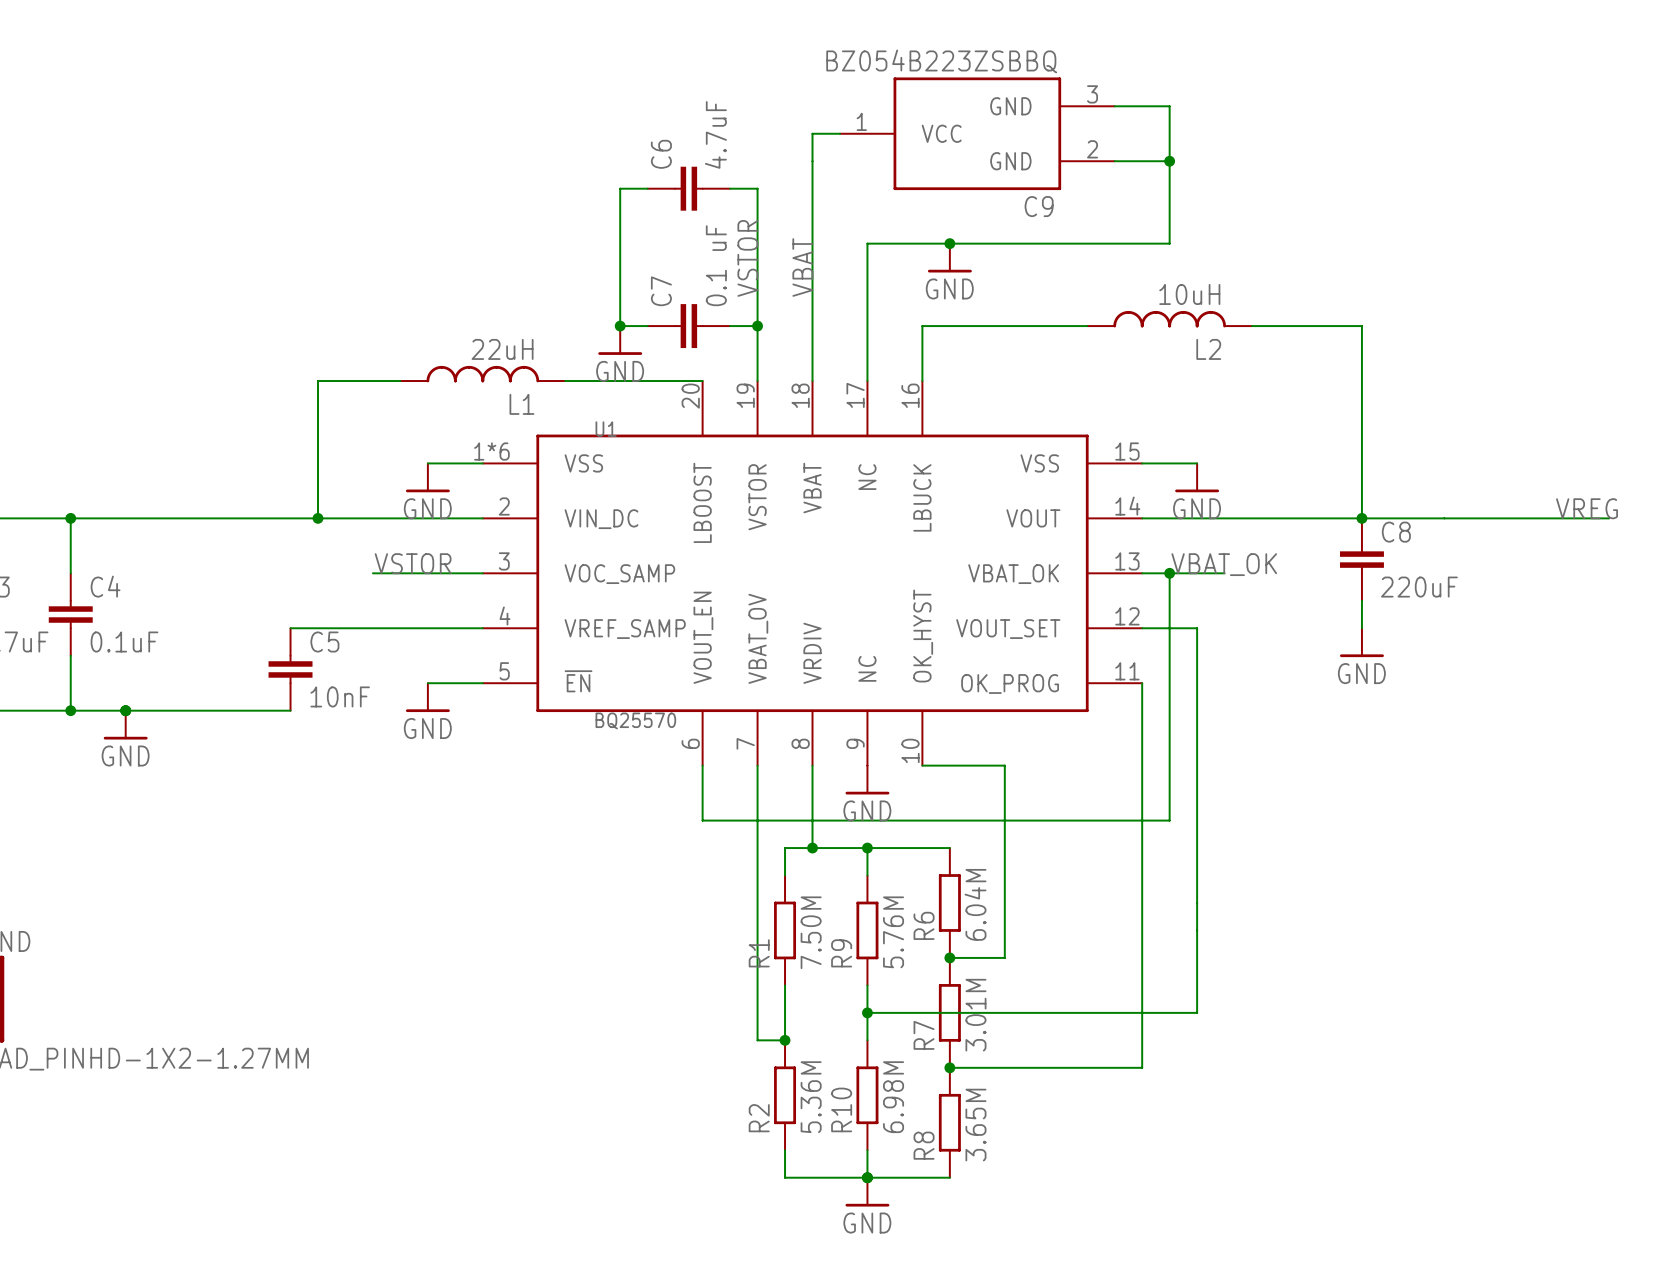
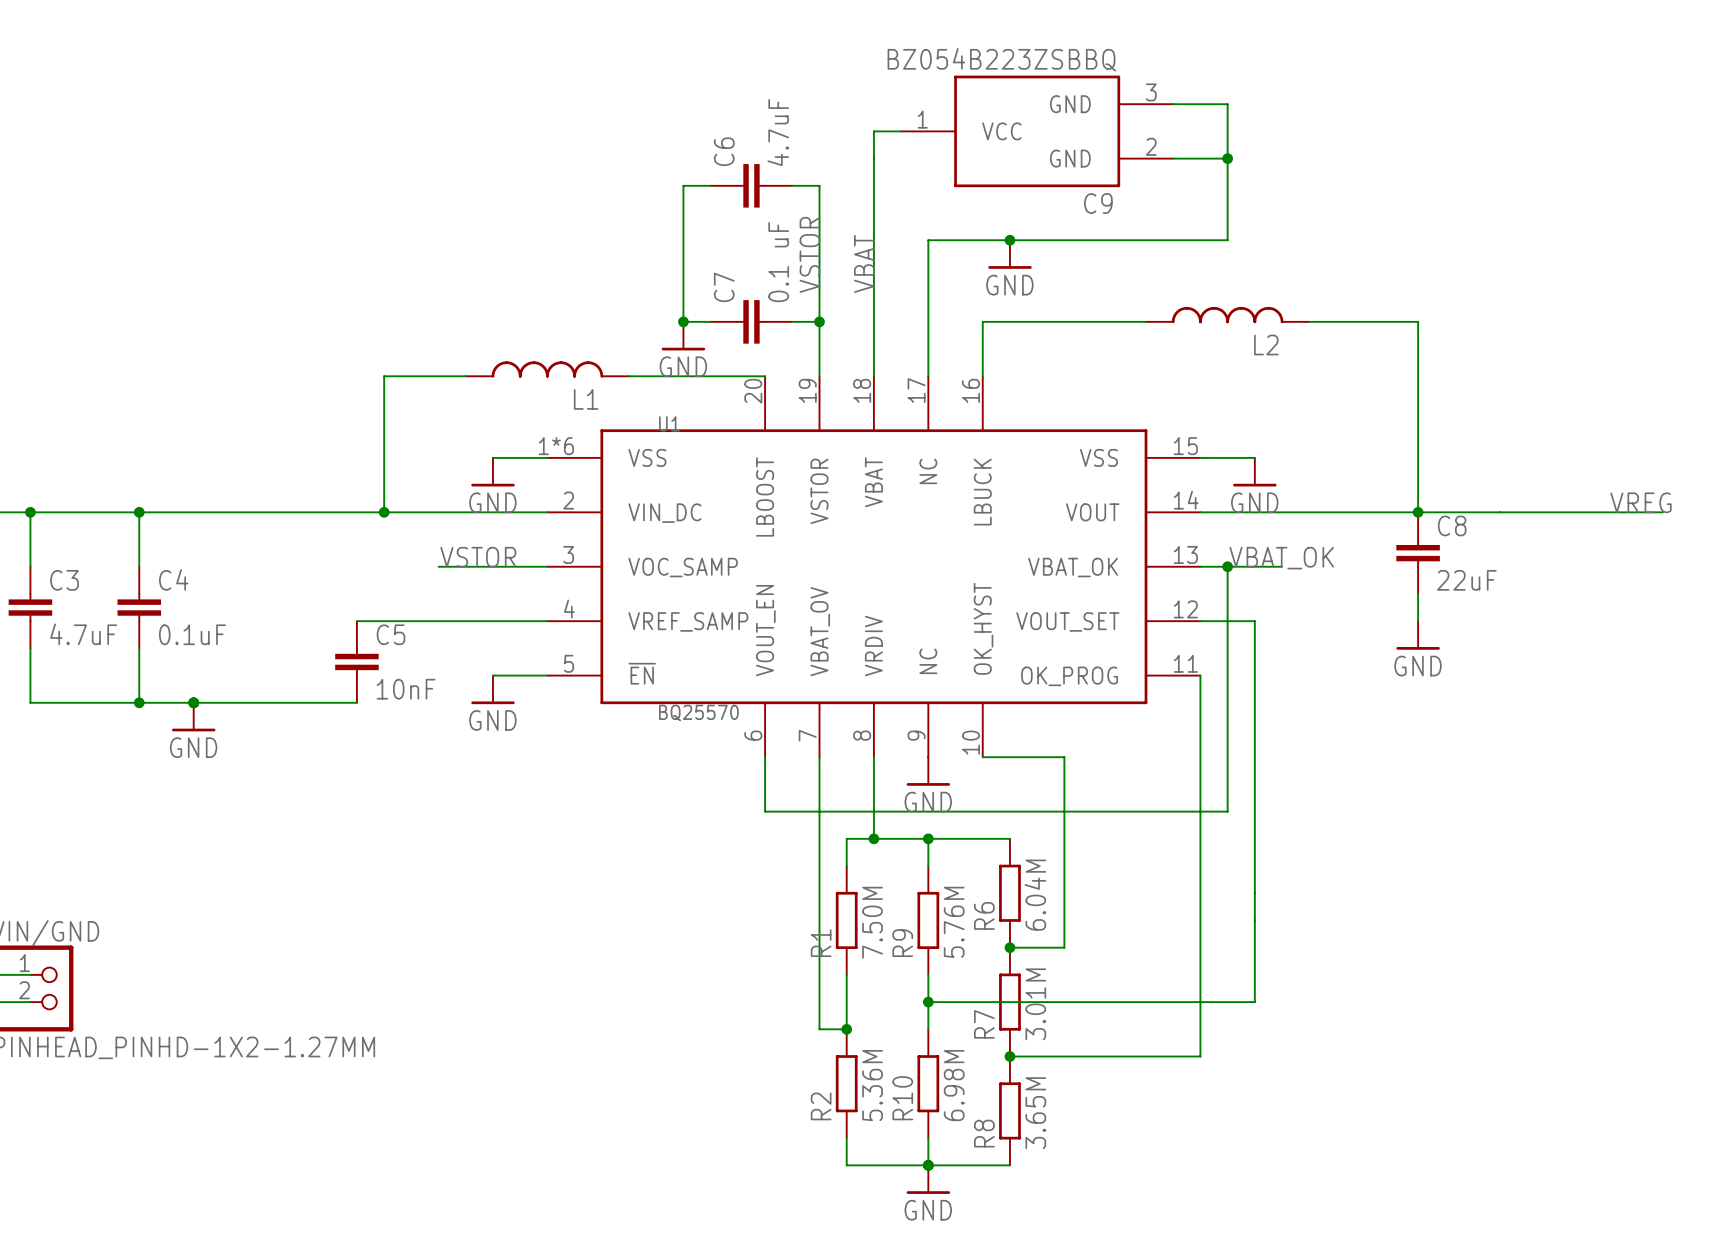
L2 value: 10uH (1189, 294) -> none
L1 value: 22uH (502, 349) -> none
C8 value: 220uF (1419, 587) -> 22uF (1466, 580)

